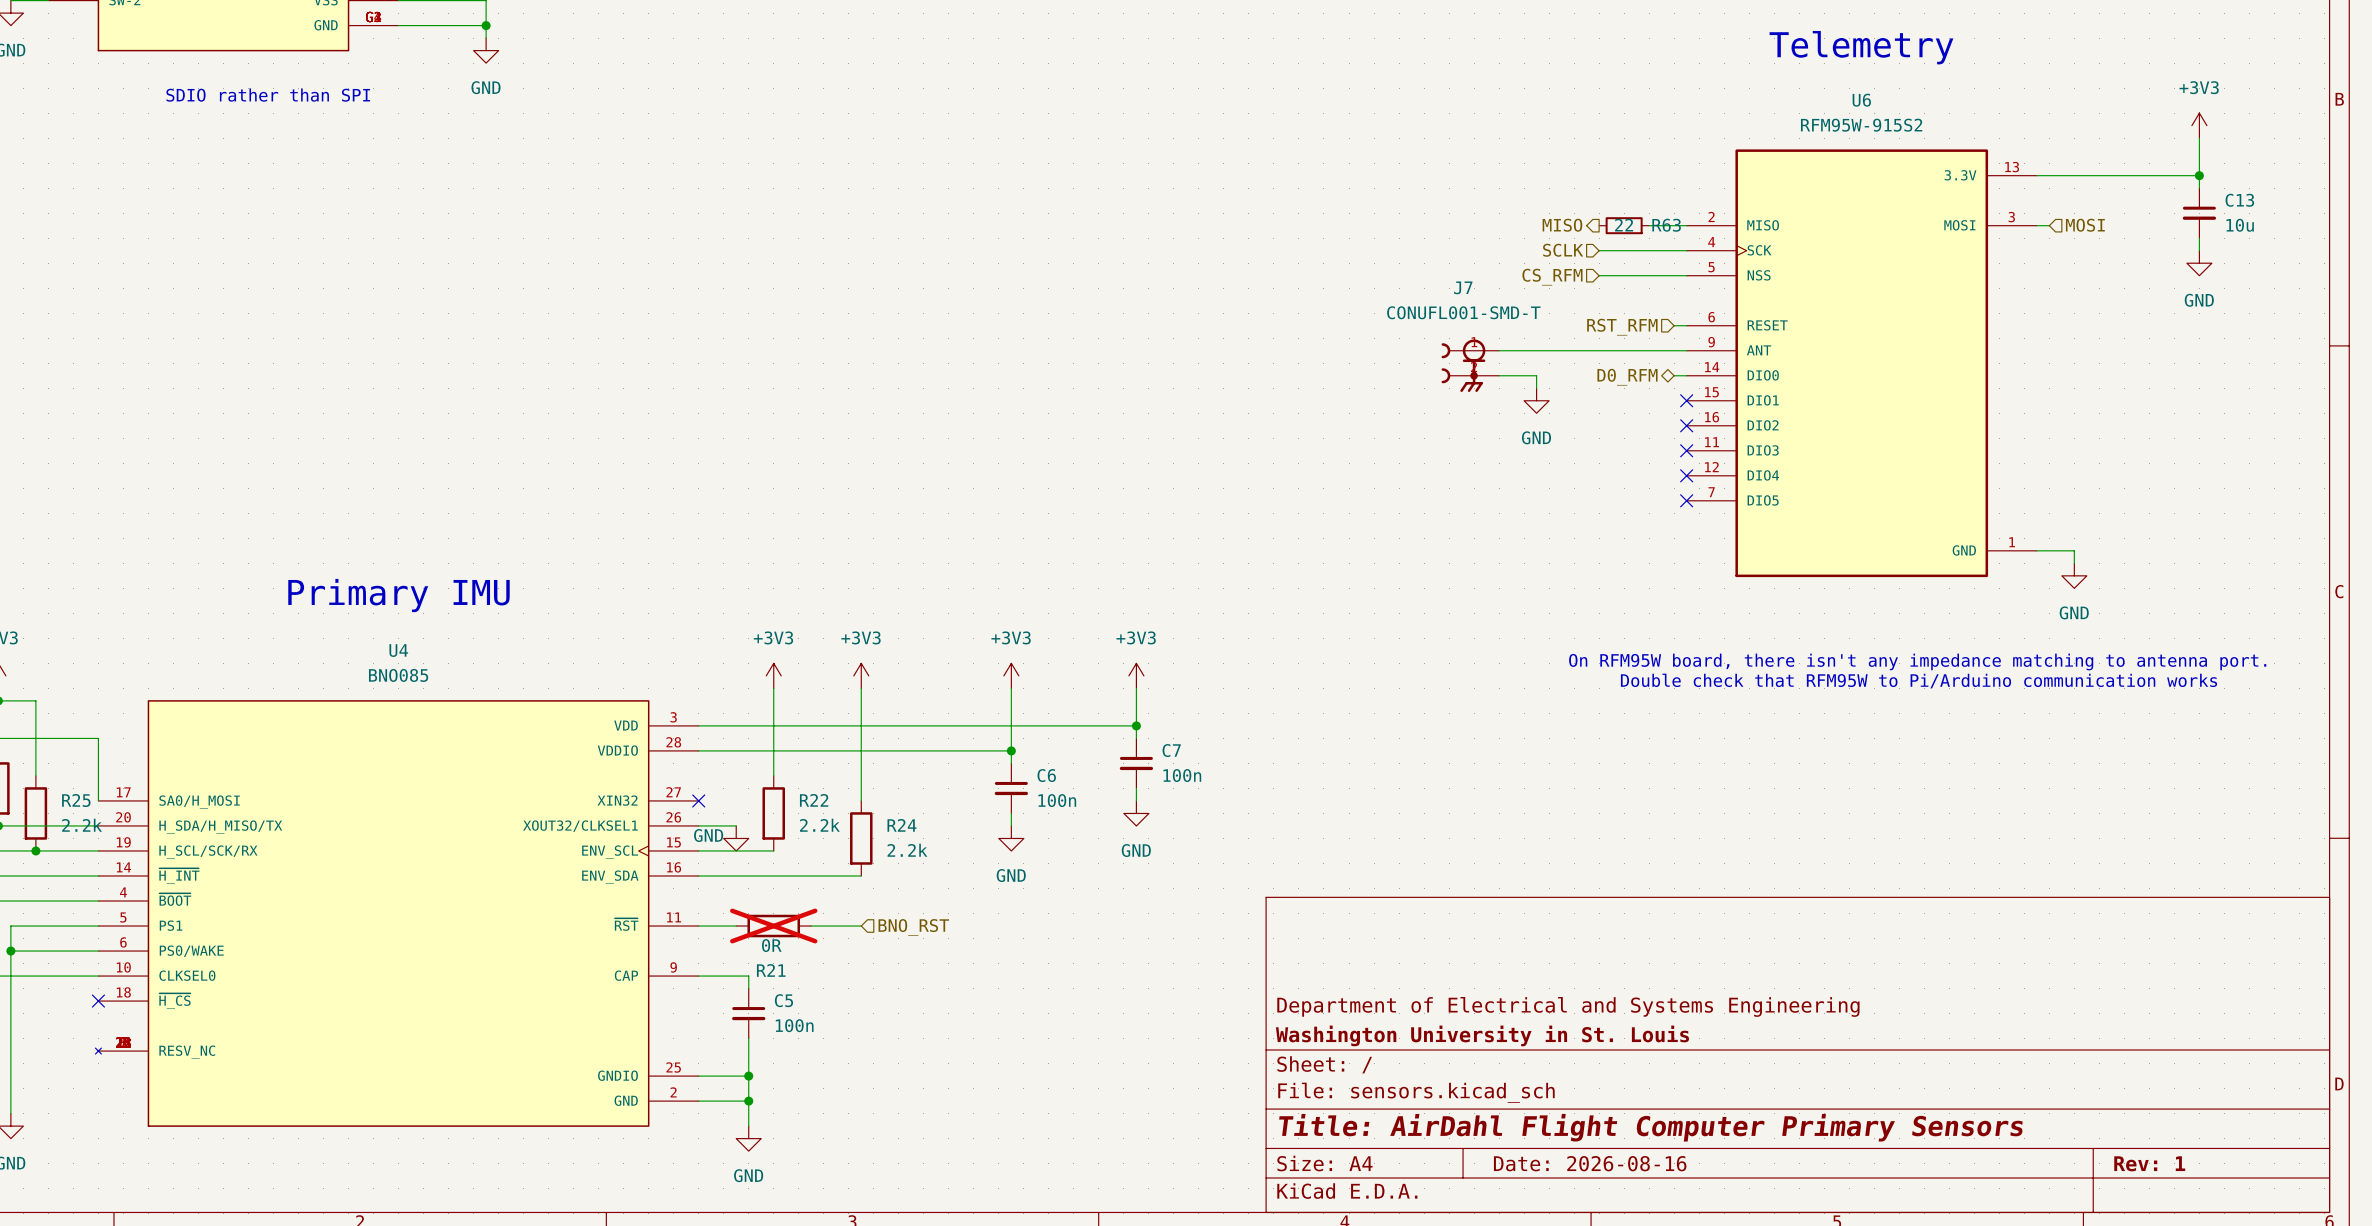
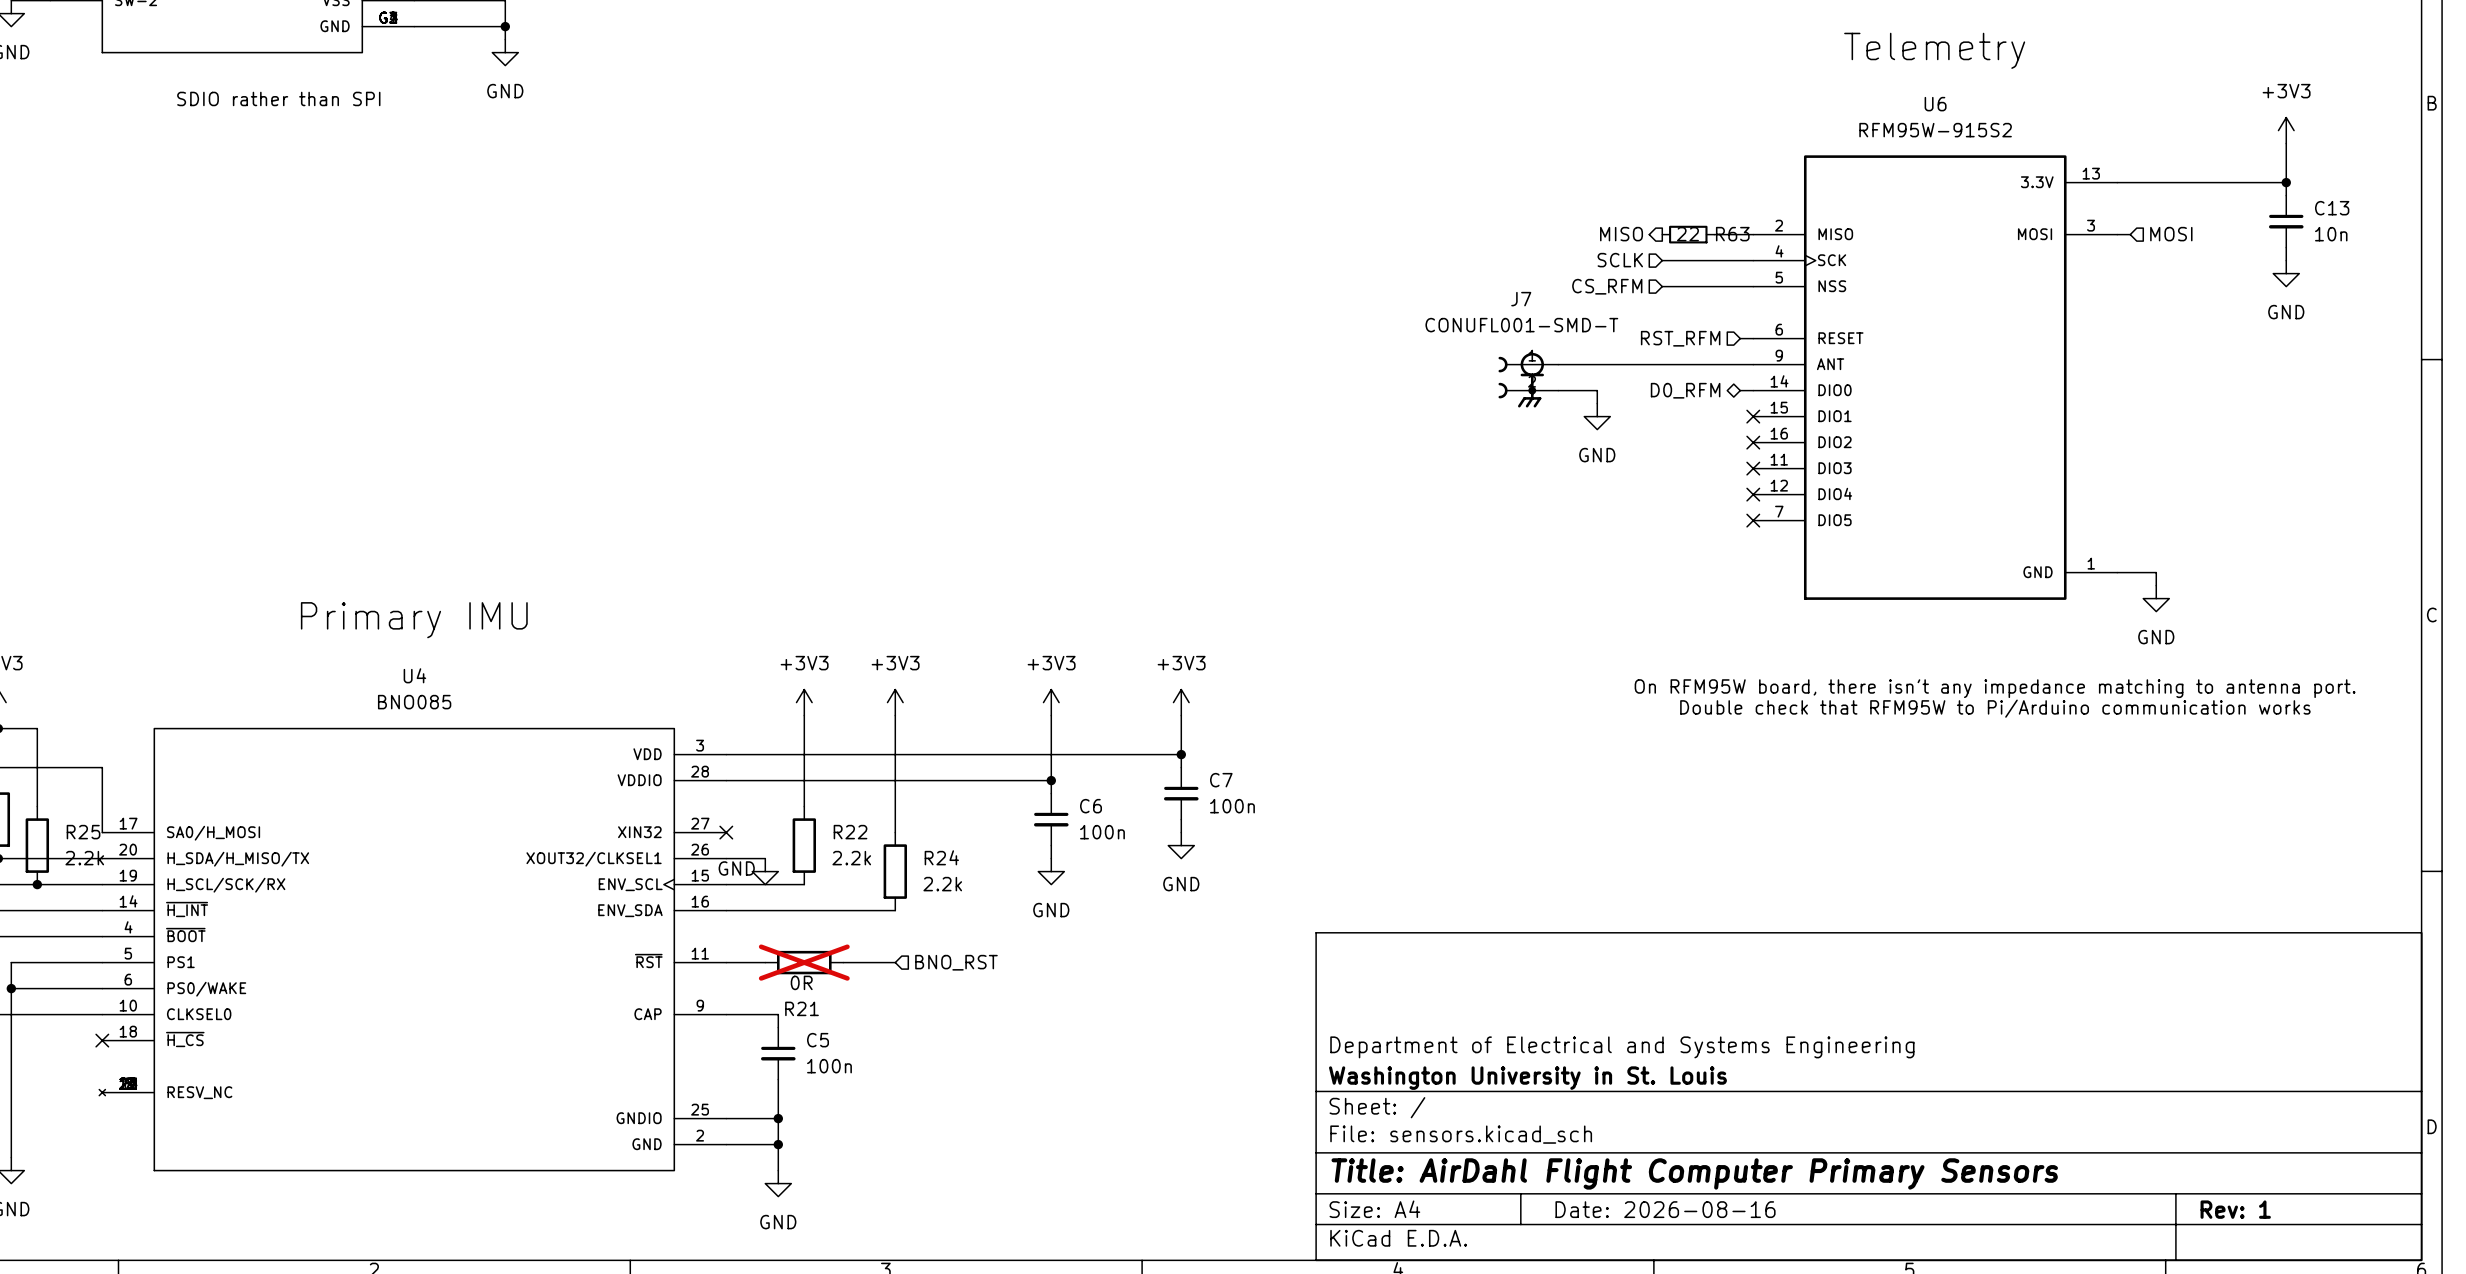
C13 value: 10u (2240, 225) -> 10n (2331, 234)

